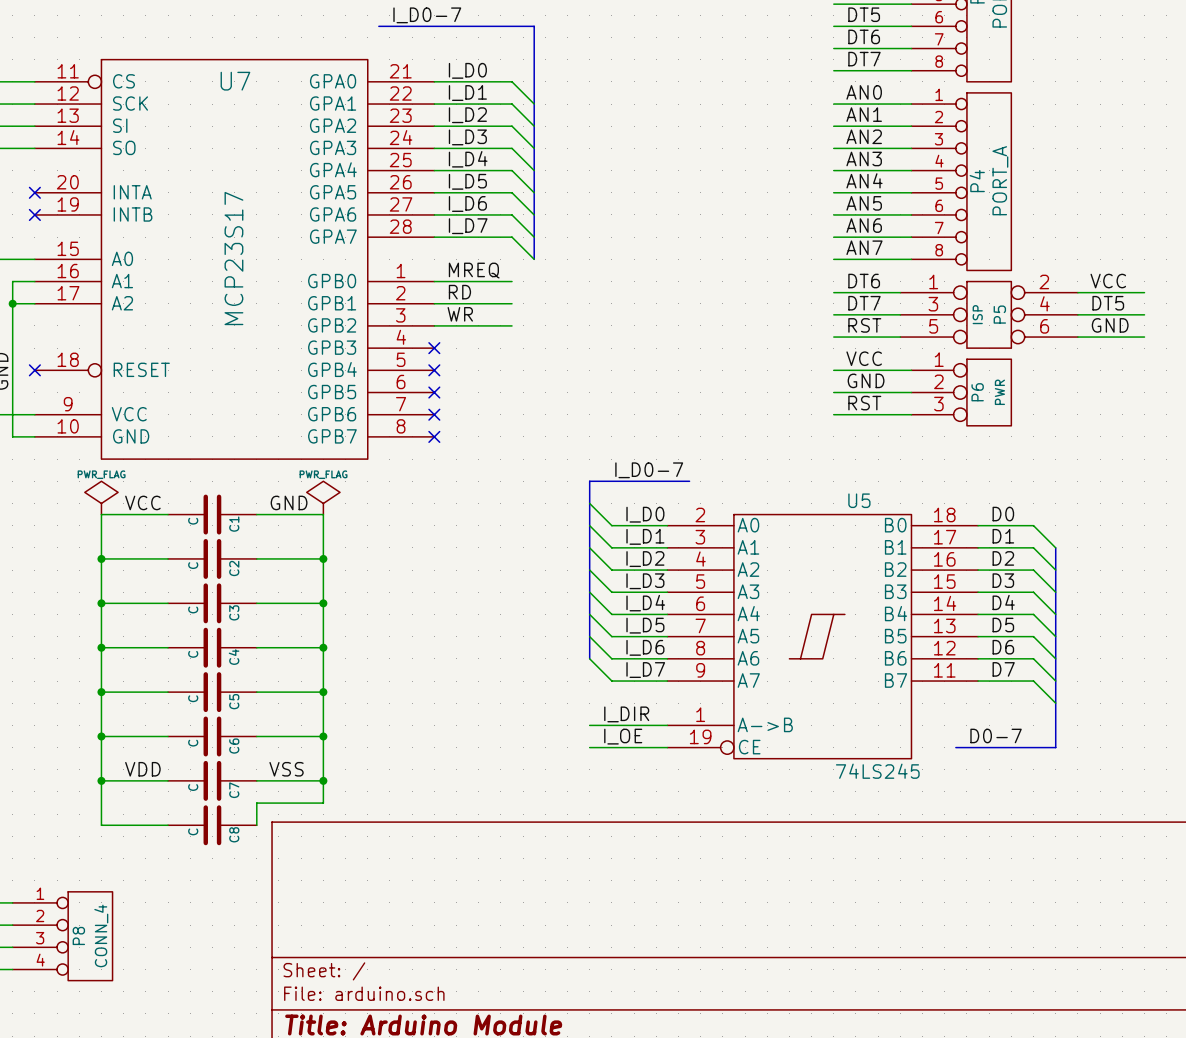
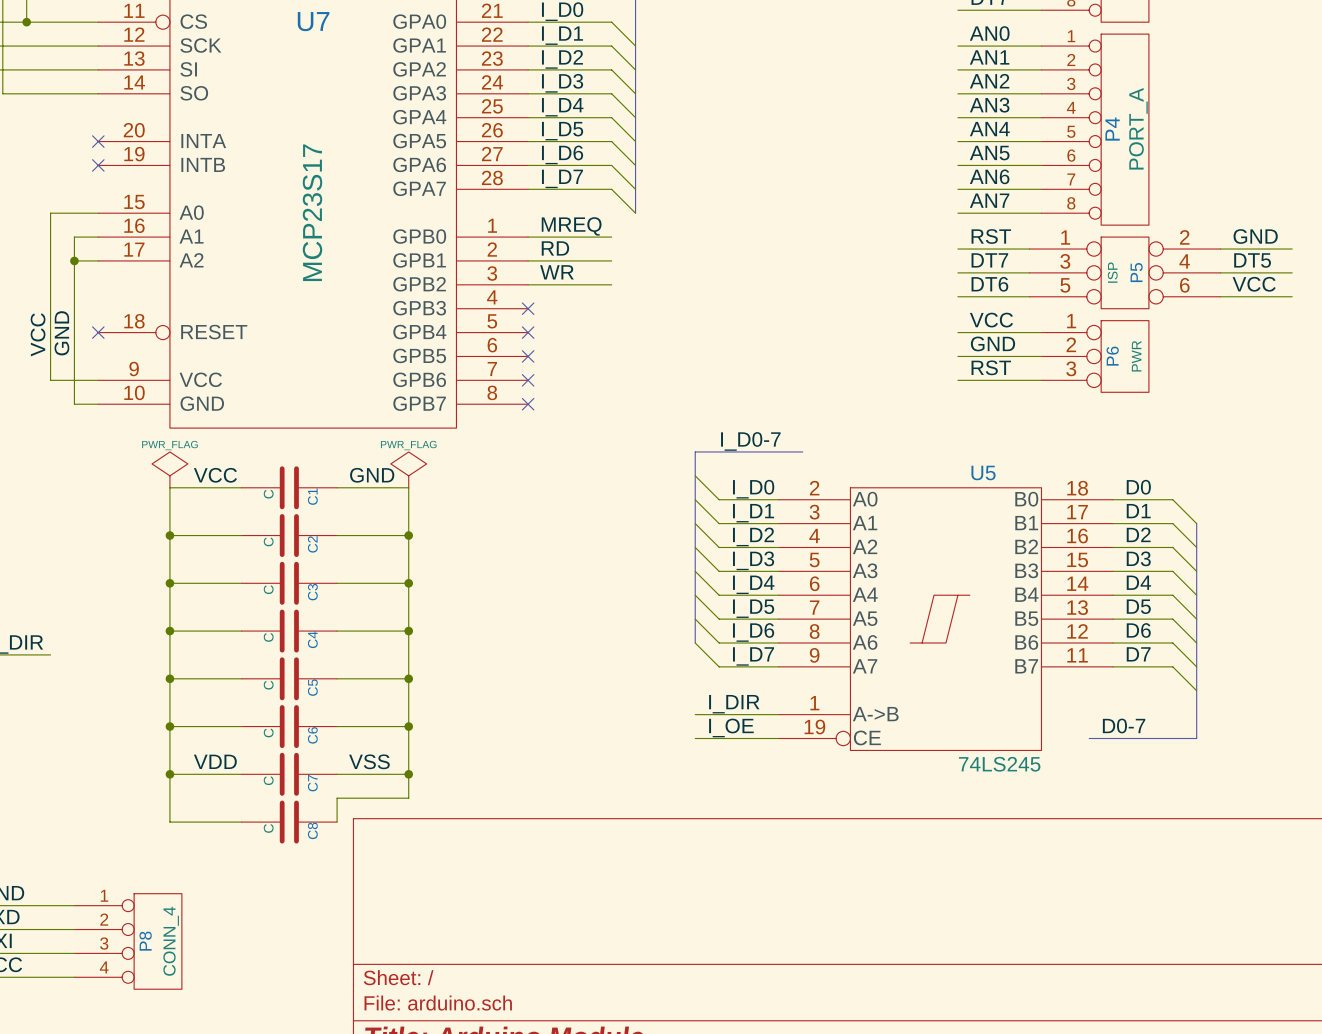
label: DT6 (864, 281) -> RST (991, 236)
label: VCC (1108, 281) -> GND (1255, 236)
label: RST (864, 325) -> DT6 (989, 284)
label: GND (1110, 325) -> VCC (1254, 284)

